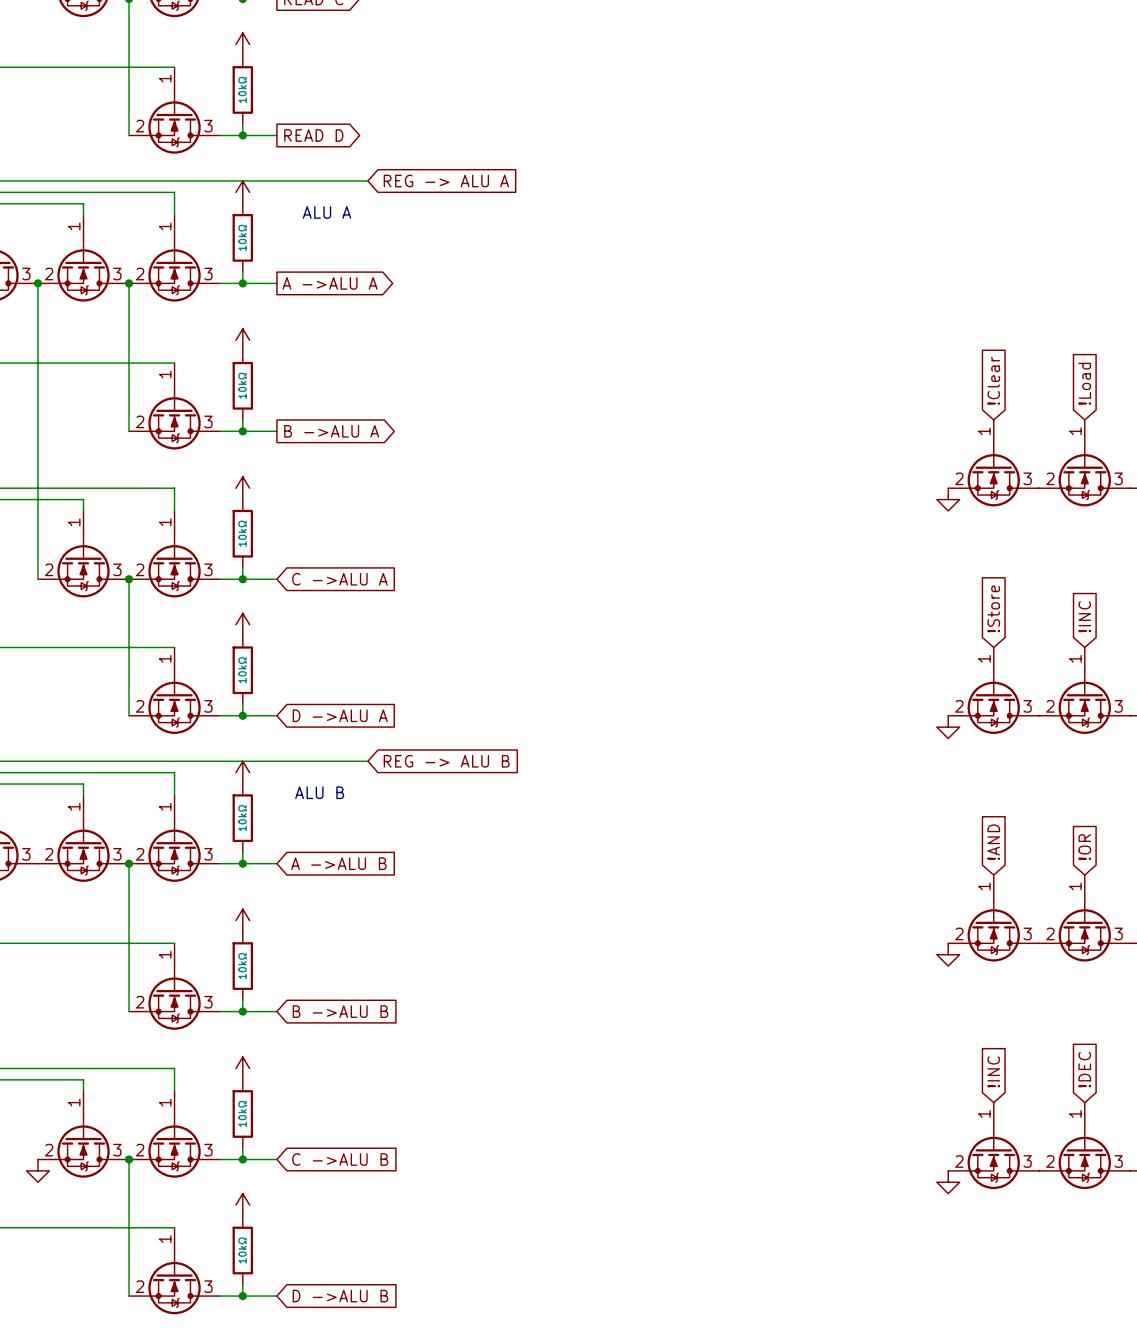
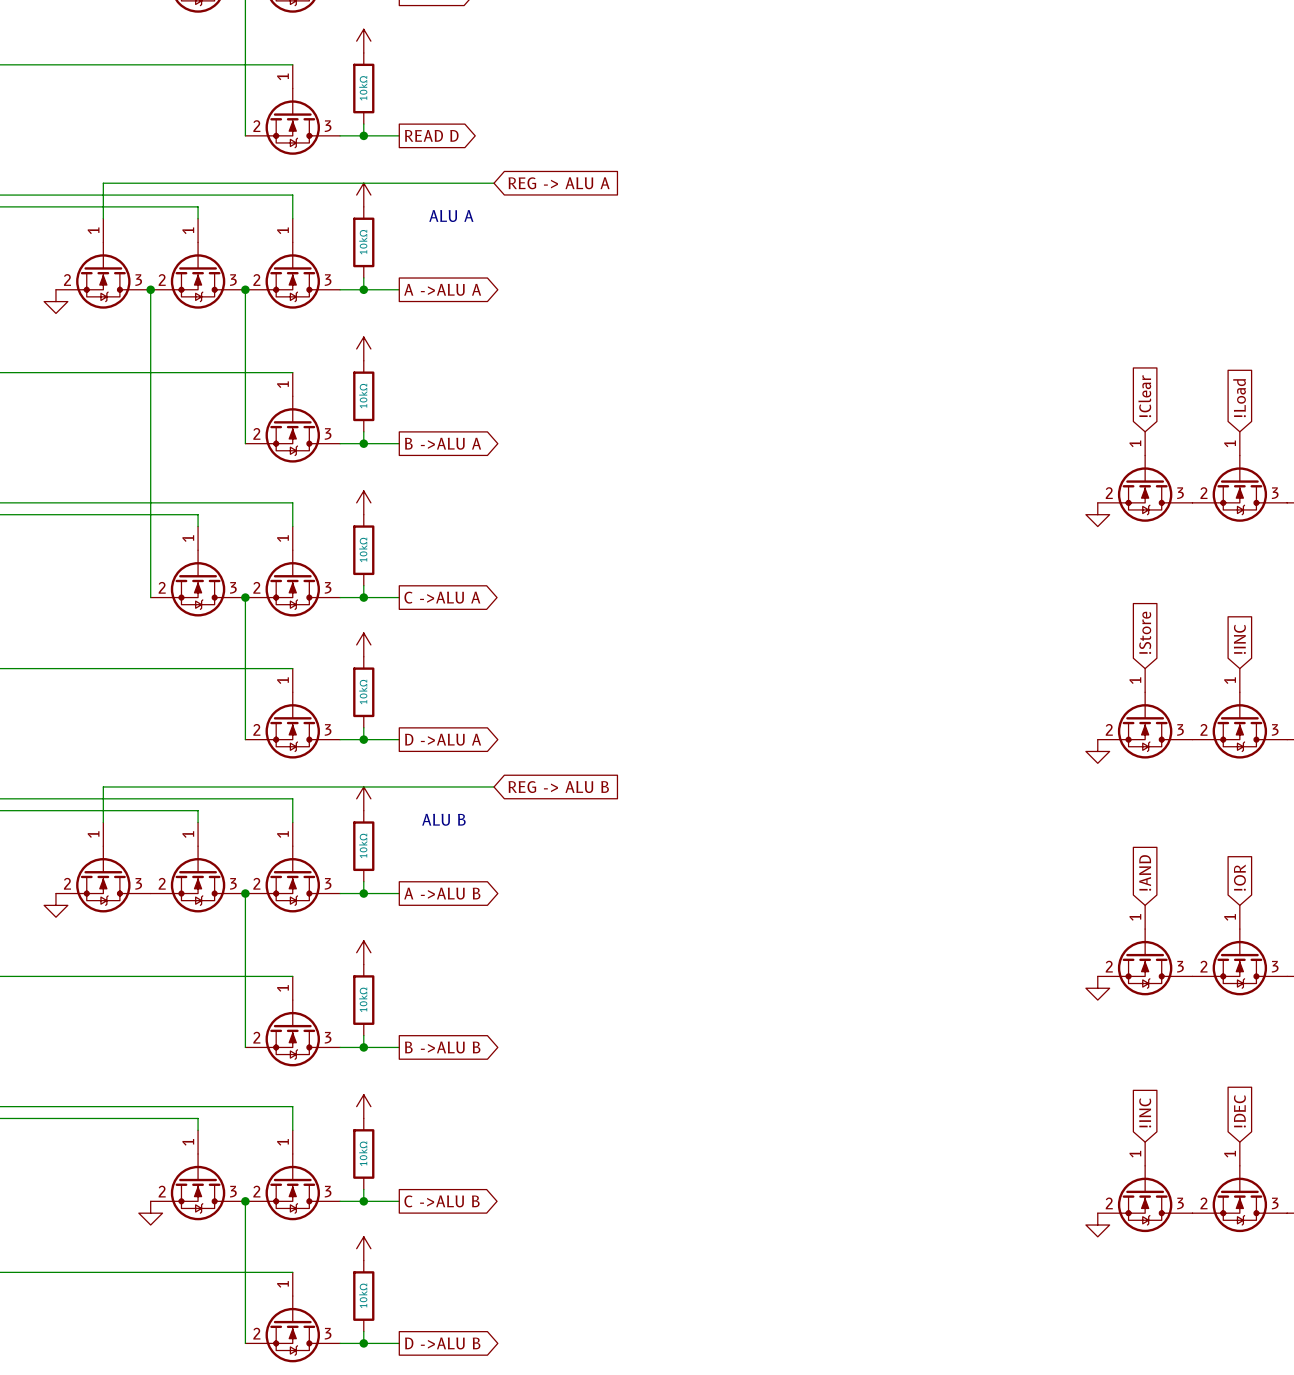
global label shape: input (339, 579) -> output (442, 597)
global label shape: input (340, 715) -> output (443, 739)
global label shape: input (338, 863) -> output (442, 893)
global label shape: input (340, 1011) -> output (442, 1047)
global label shape: input (340, 1159) -> output (442, 1201)
global label shape: input (340, 1296) -> output (442, 1343)

